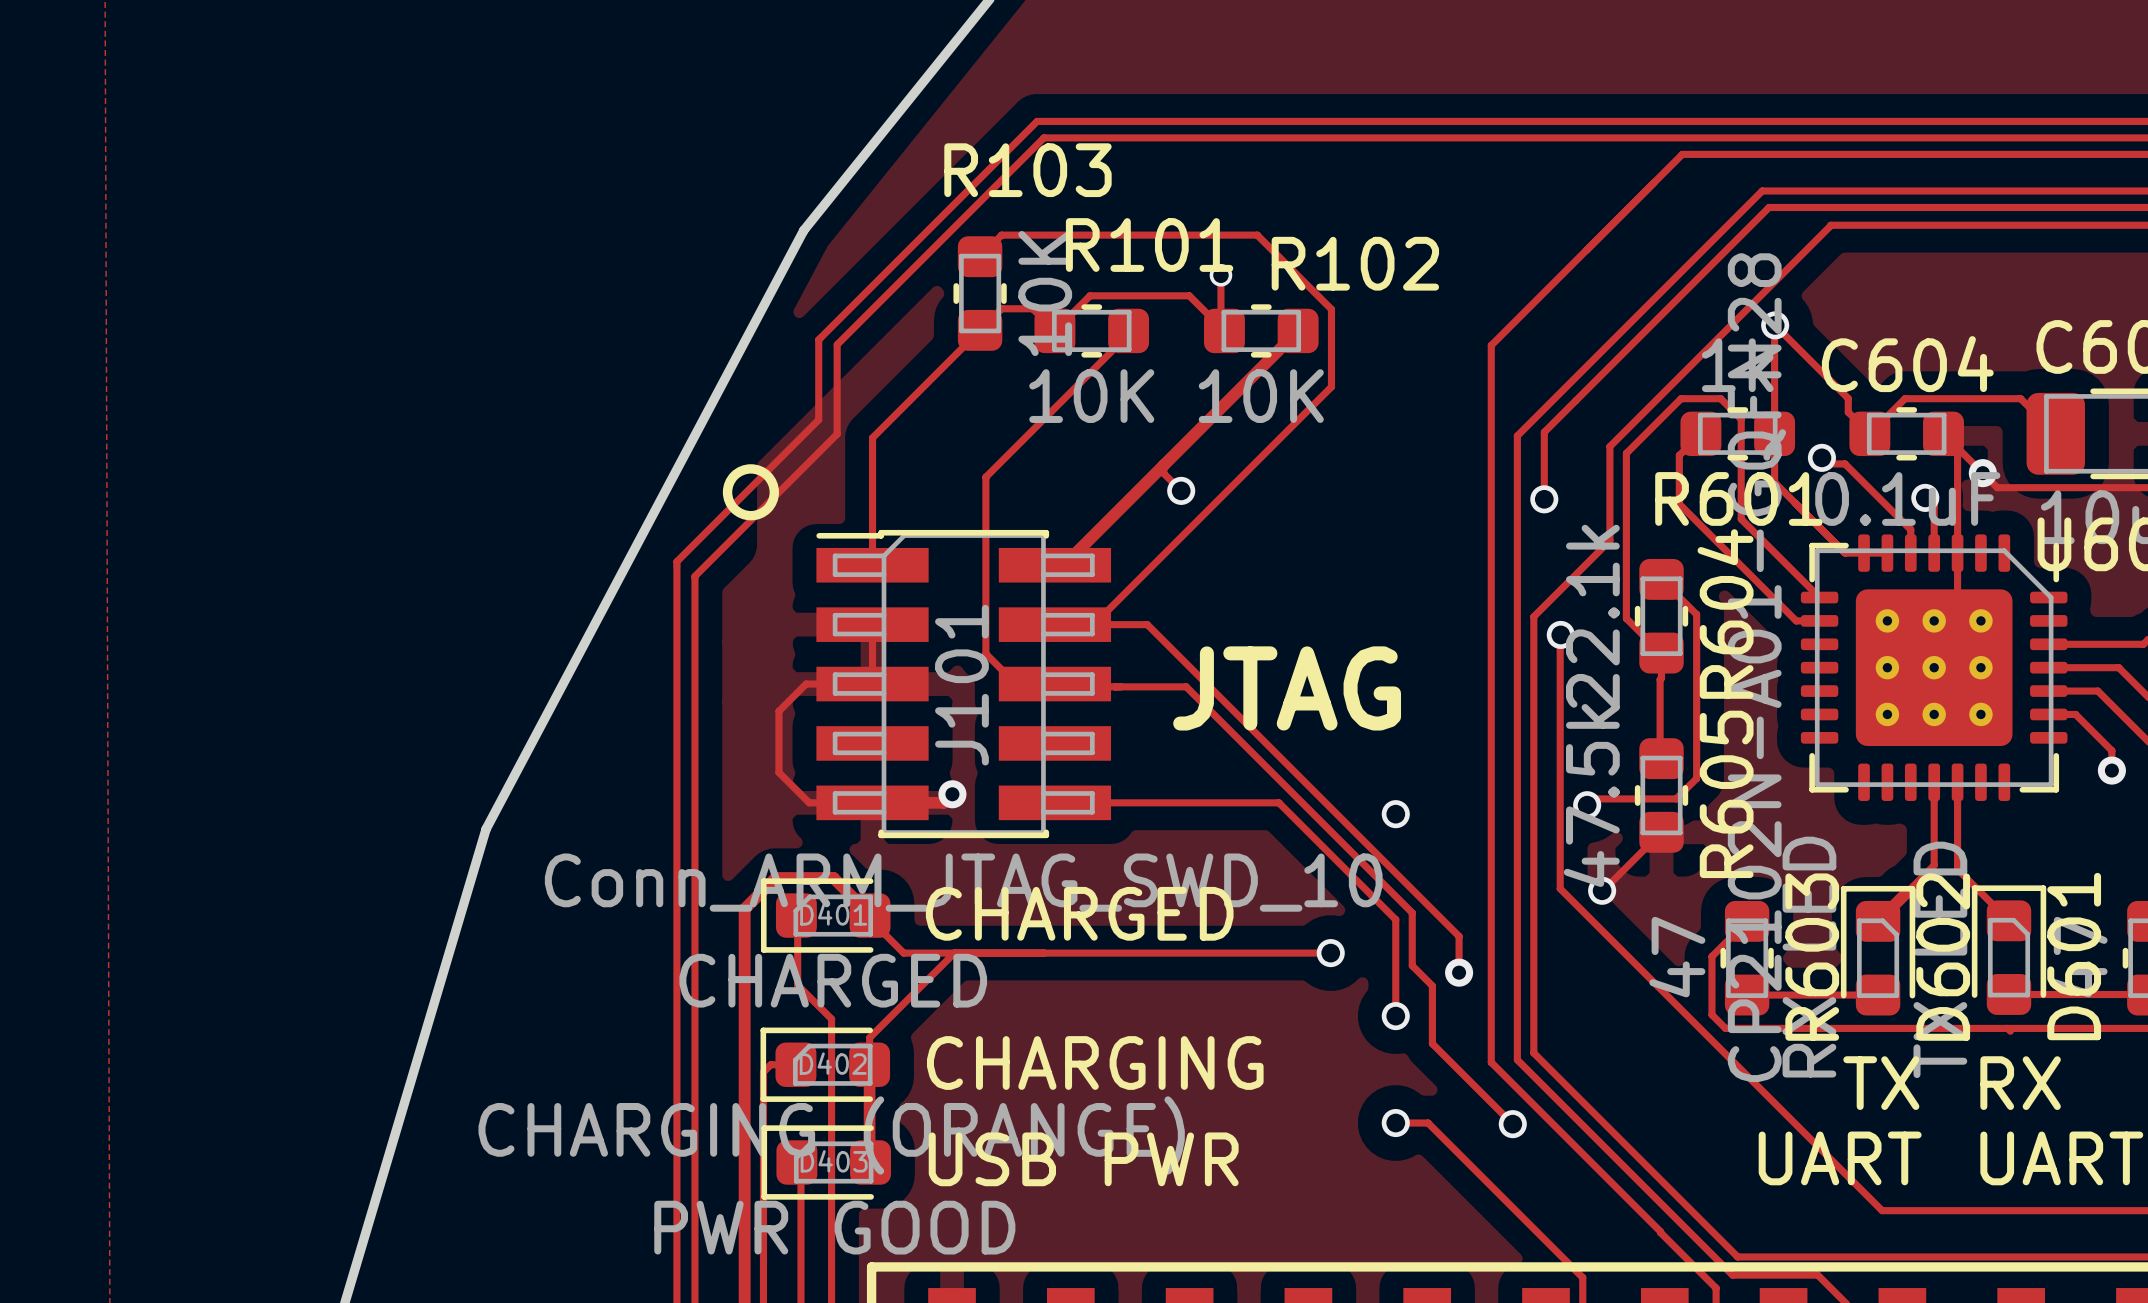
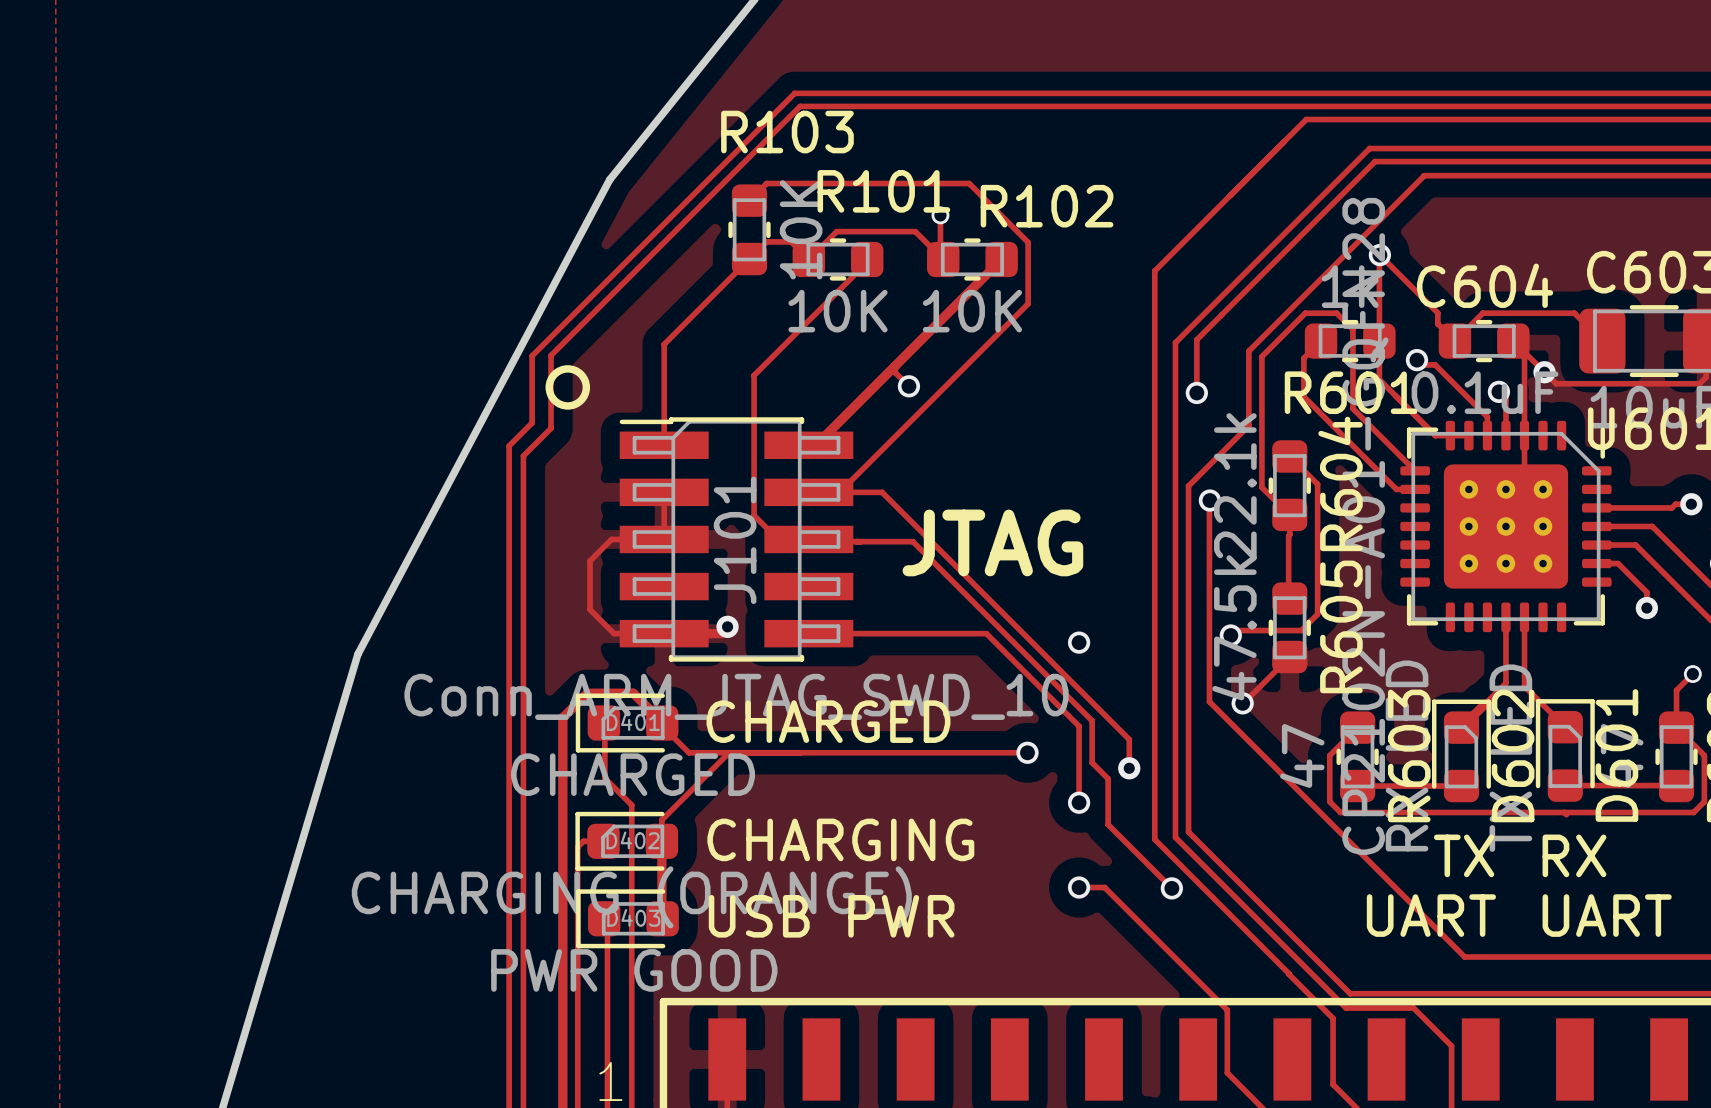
track: (818, 339) (818, 419) (676, 561) (676, 566) -> (621, 266) (532, 355) (532, 422) (509, 445)
track: (837, 344) (837, 434) (694, 576) (694, 578) -> (636, 270) (551, 355) (551, 428) (523, 455)

